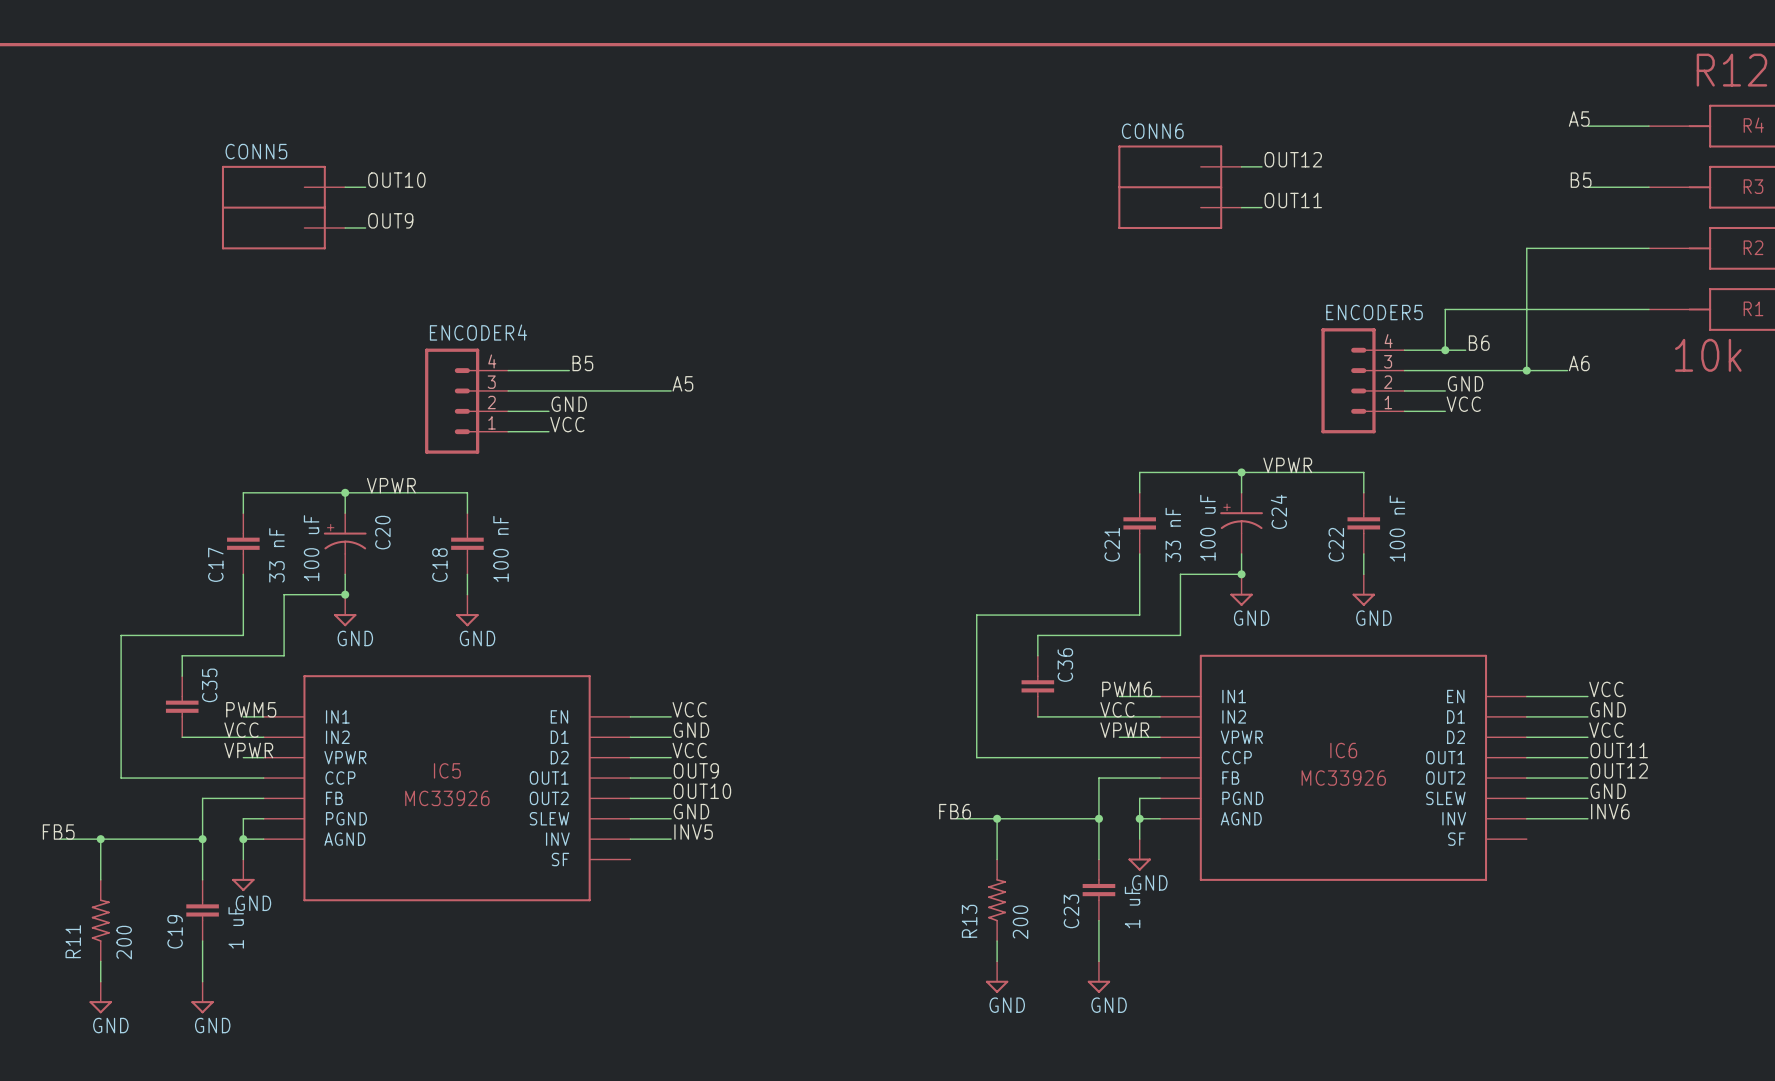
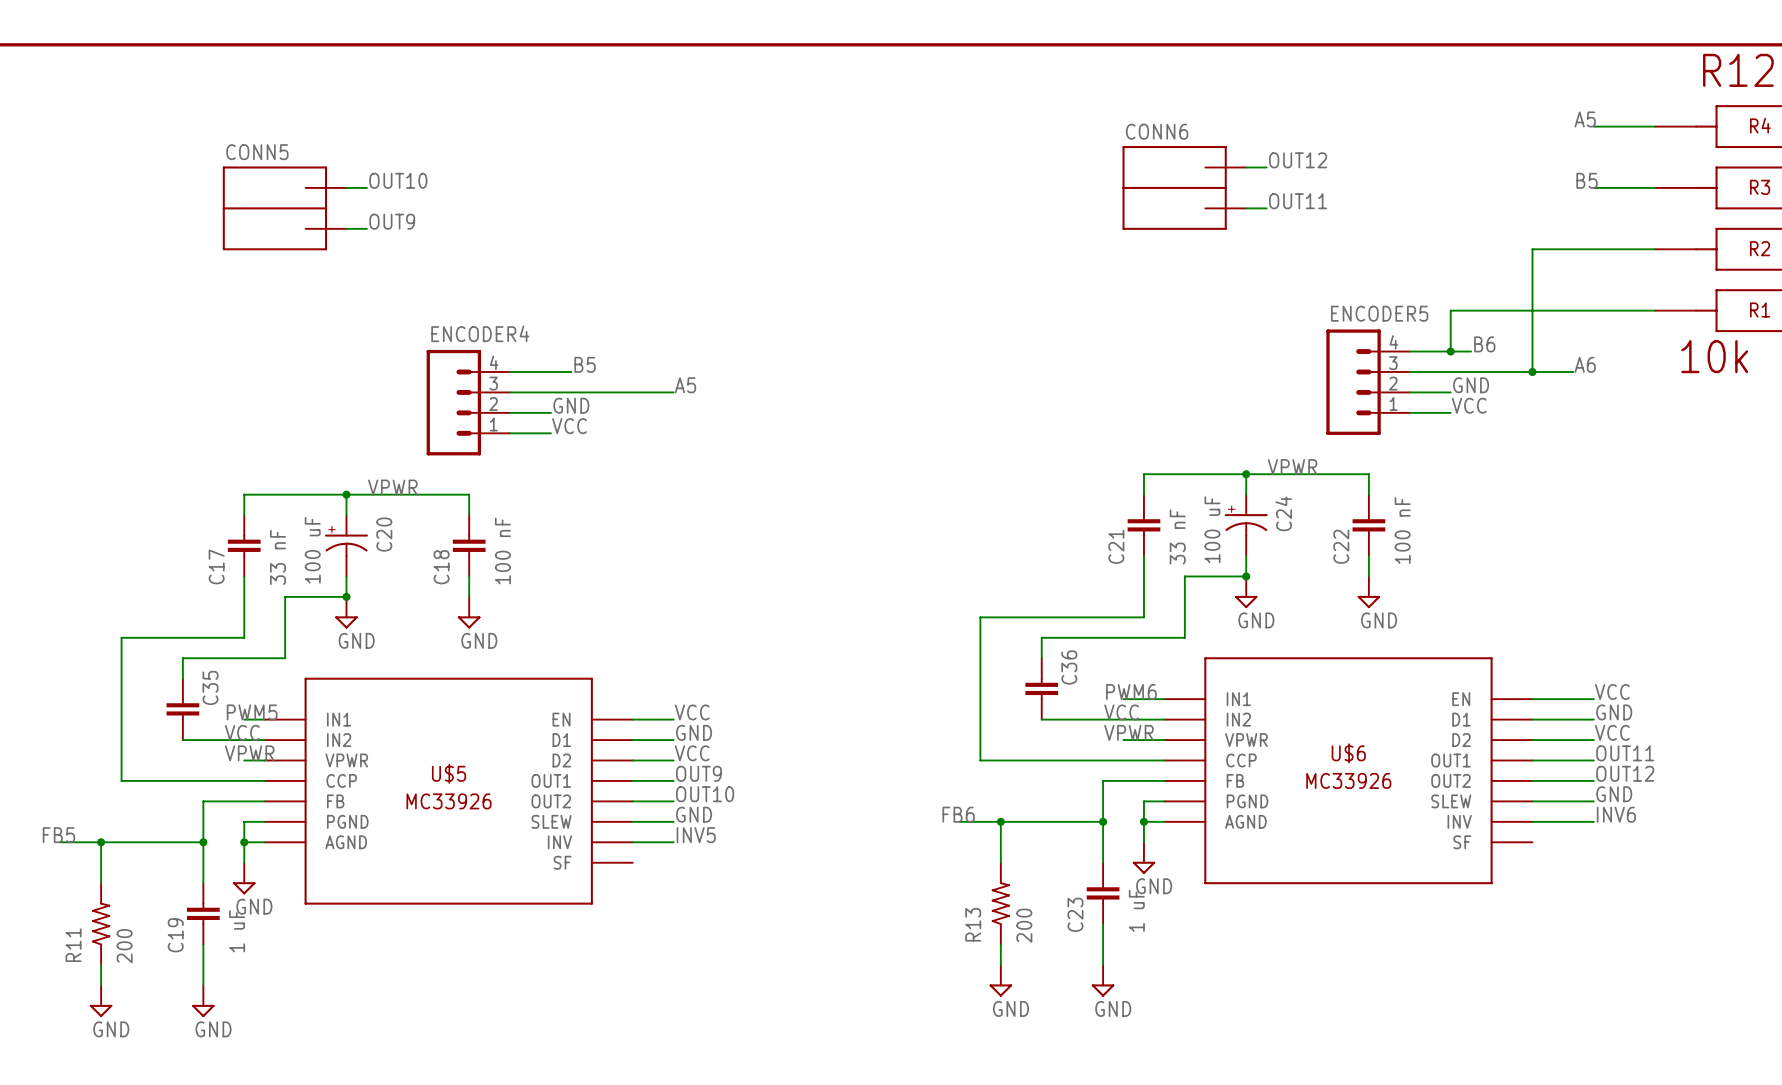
IC6 name: IC6 (1343, 750) -> U$6 (1348, 753)
IC5 name: IC5 (447, 770) -> U$5 (449, 773)

